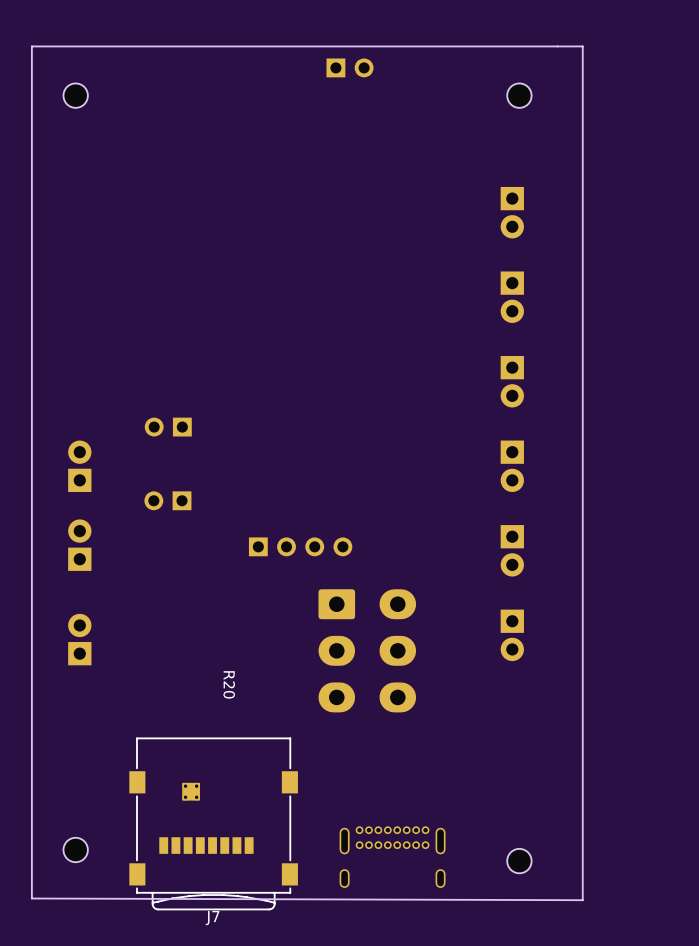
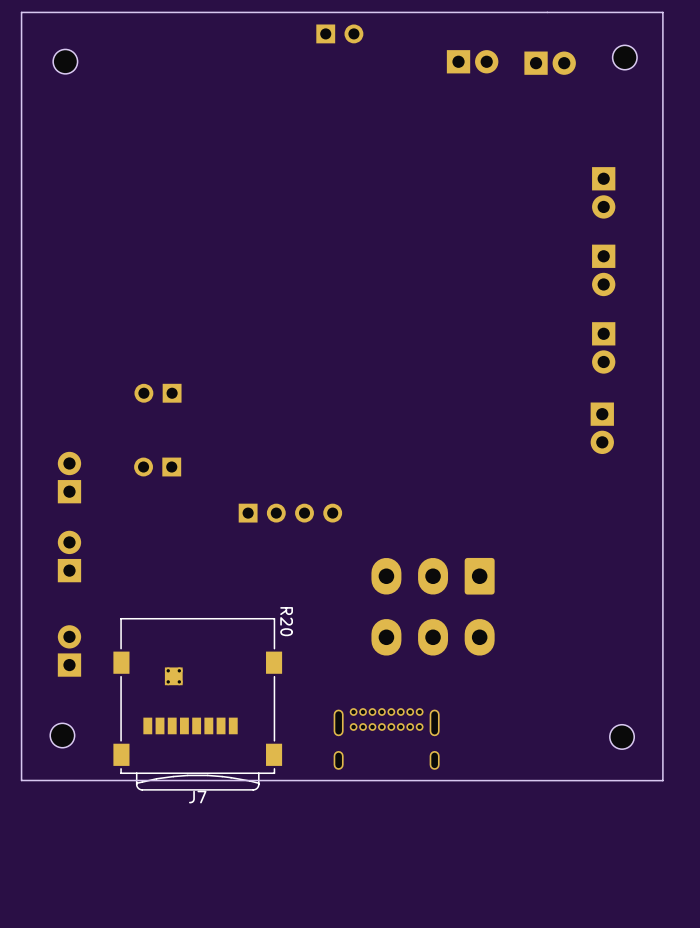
board edge: (582, 46) (582, 900) (31, 898) (31, 814) -> (572, 12) (662, 12) (662, 780) (21, 780)
part: none -> (472, 61)
part position: (519, 95) -> (624, 57)
part: none -> (550, 63)
part: (512, 212) -> none
part: none -> (603, 192)
part: (512, 297) -> none
part: none -> (603, 270)
part: (512, 381) -> none
part: none -> (603, 347)
part: none -> (602, 428)
part: (79, 466) -> none
part: (512, 466) -> none
part: none -> (69, 477)
part: (79, 545) -> none
part: (512, 550) -> none
part: none -> (69, 556)
part: (512, 635) -> none
part: (79, 639) -> none
part rotation: 0° (367, 650) -> 90° clockwise (433, 606)
part position: (367, 650) -> (433, 606)
part: none -> (69, 650)
R20 position: (229, 684) -> (286, 621)
part position: (191, 791) -> (173, 676)
J7 position: (213, 823) -> (197, 704)
part position: (75, 849) -> (62, 735)
part position: (392, 857) -> (386, 738)
part position: (519, 861) -> (622, 736)

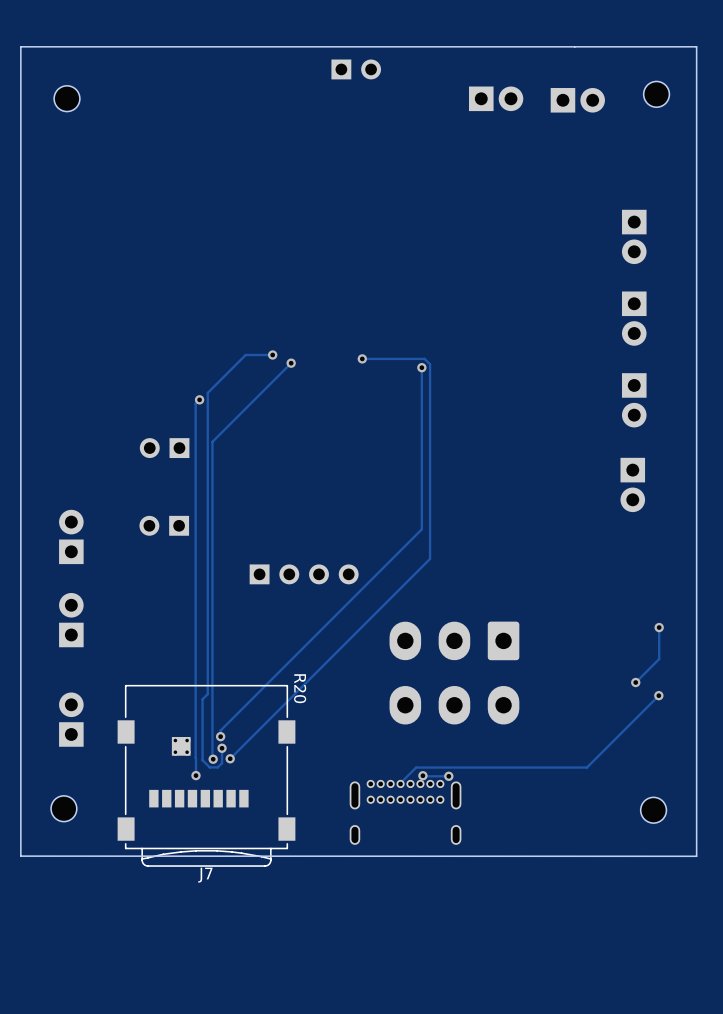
track: none -> (272, 354) (245, 354) (207, 392) (207, 694) (202, 699) (202, 760) (209, 767) (217, 767) (222, 763) (222, 748)
via: none -> (272, 354)
track: none -> (362, 358) (424, 358) (430, 364) (430, 558) (230, 758)
via: none -> (362, 358)
track: none -> (291, 363) (212, 441) (213, 759)
via: none -> (291, 363)
track: none -> (421, 367) (421, 529) (220, 730) (220, 736)
via: none -> (421, 367)
track: none -> (199, 399) (195, 403) (195, 775)
via: none -> (199, 399)
track: none -> (659, 627) (659, 659) (635, 682)
via: none -> (659, 627)
via: none -> (635, 682)
track: none -> (658, 695) (586, 767) (416, 767) (400, 783)
via: none -> (658, 695)
via: none -> (220, 736)
via: none -> (222, 748)
via: none -> (213, 759)
via: none -> (230, 758)
via: none -> (195, 775)
track: none -> (422, 775) (448, 776)
via: none -> (422, 775)
via: none -> (448, 776)

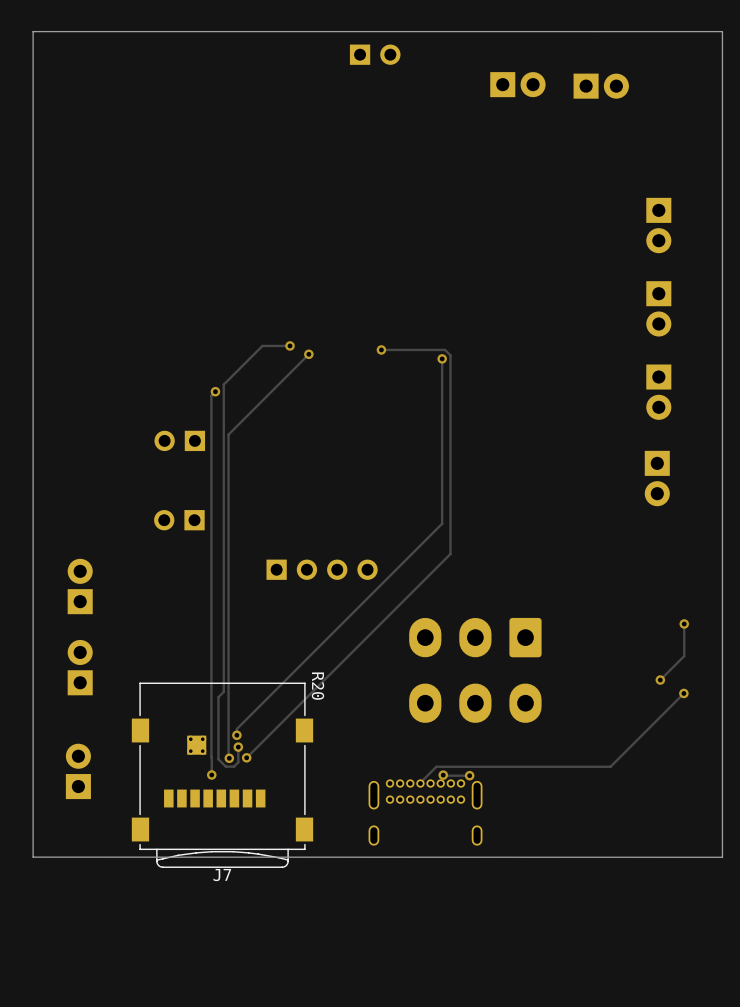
part: (656, 94) -> none
part: (67, 98) -> none
part: (71, 536) -> none
part: none -> (80, 586)
part: (71, 620) -> none
part: none -> (80, 667)
part: (71, 719) -> none
part: none -> (78, 771)
part: (63, 808) -> none
part: (653, 810) -> none

